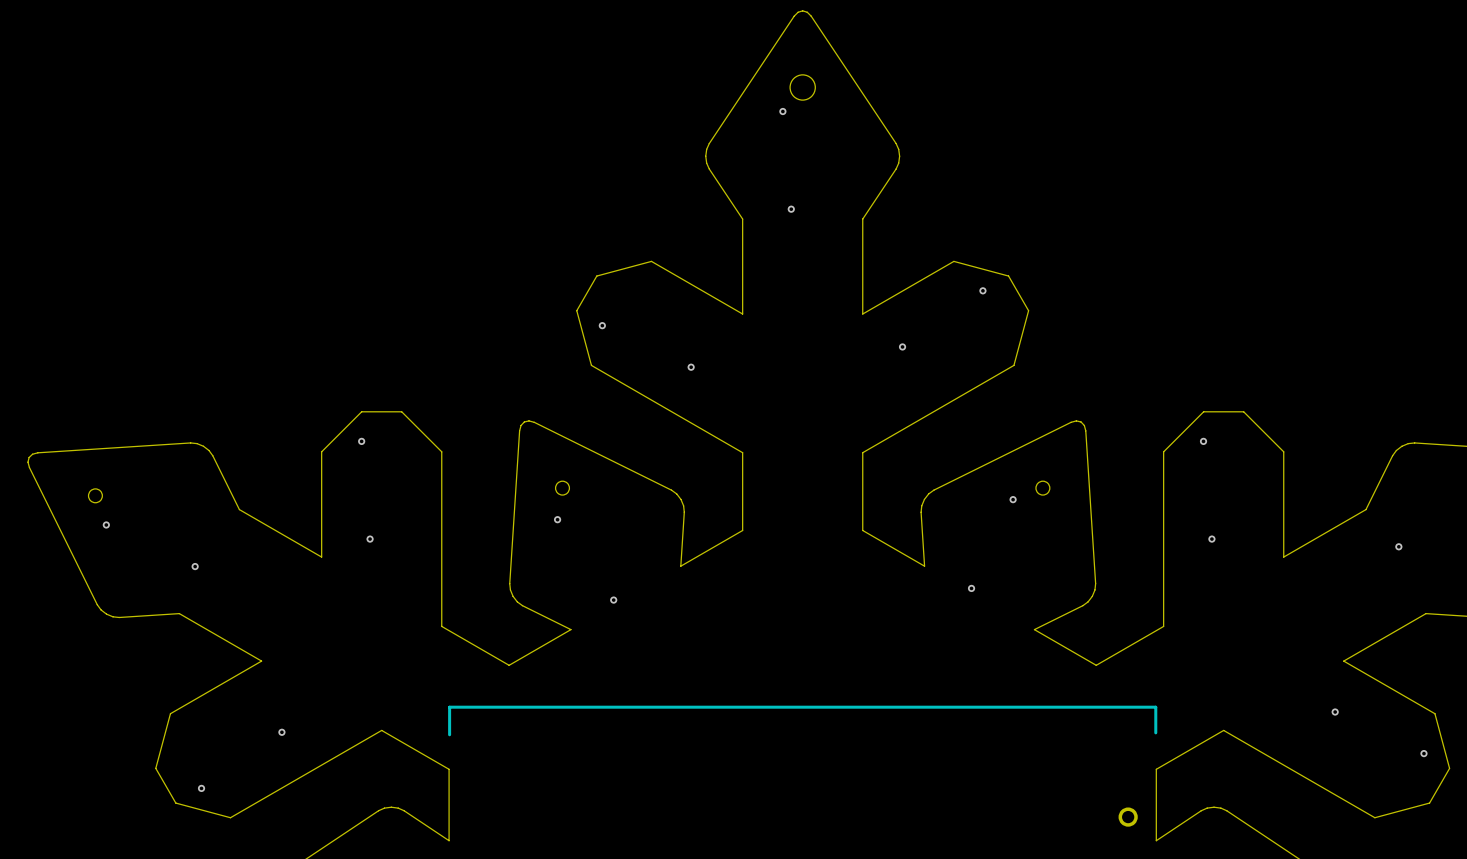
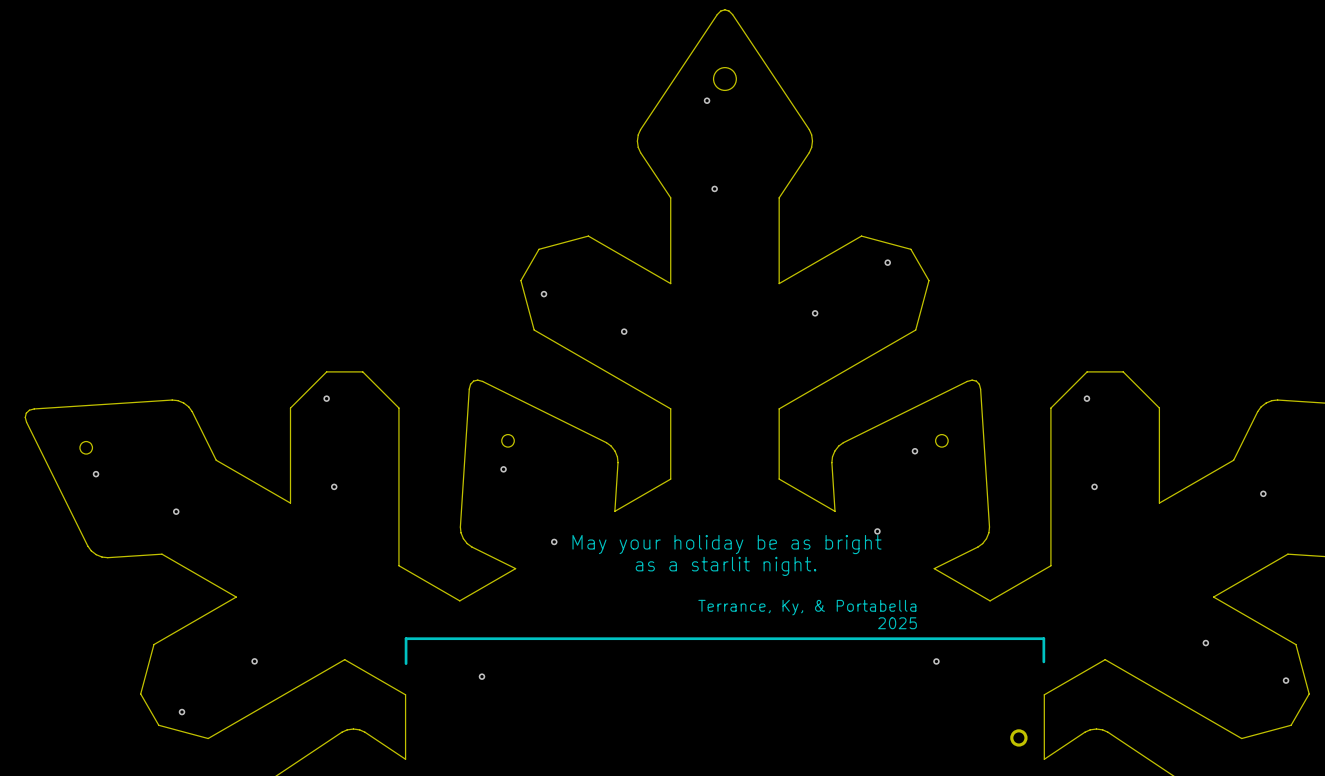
text: none -> May your holiday be as bright (727, 544)
text: none -> as a starlit night. (726, 566)
text: none -> Terrance, Ky, & Portabella (807, 607)
text: none -> 2025 (897, 623)
via: none -> (936, 661)
via: none -> (481, 676)

